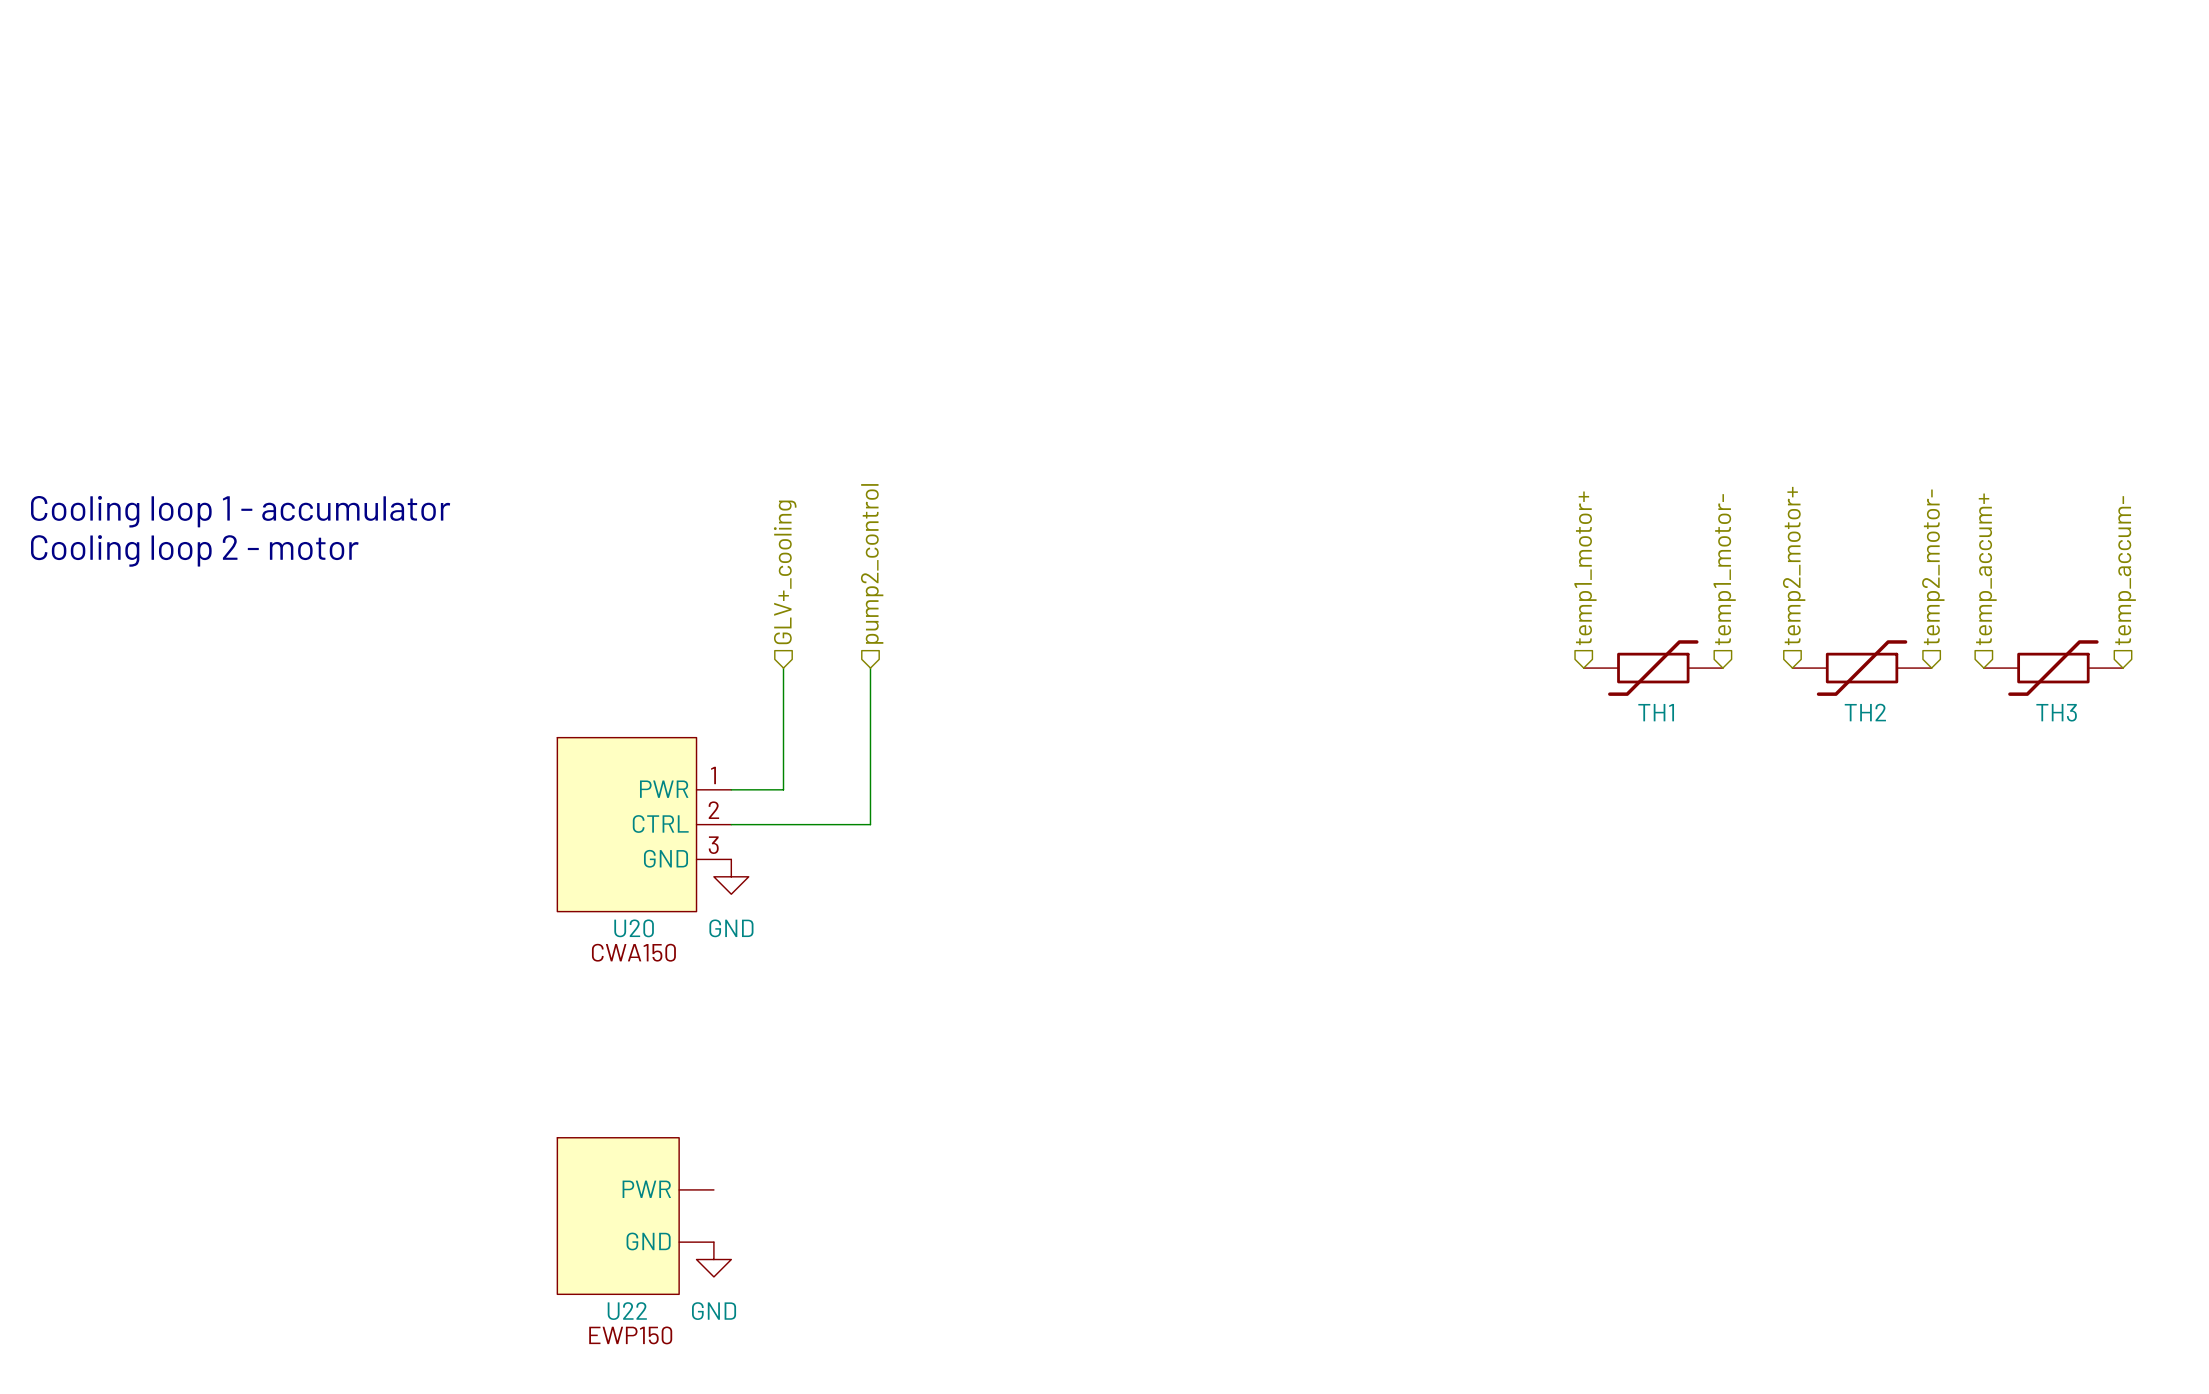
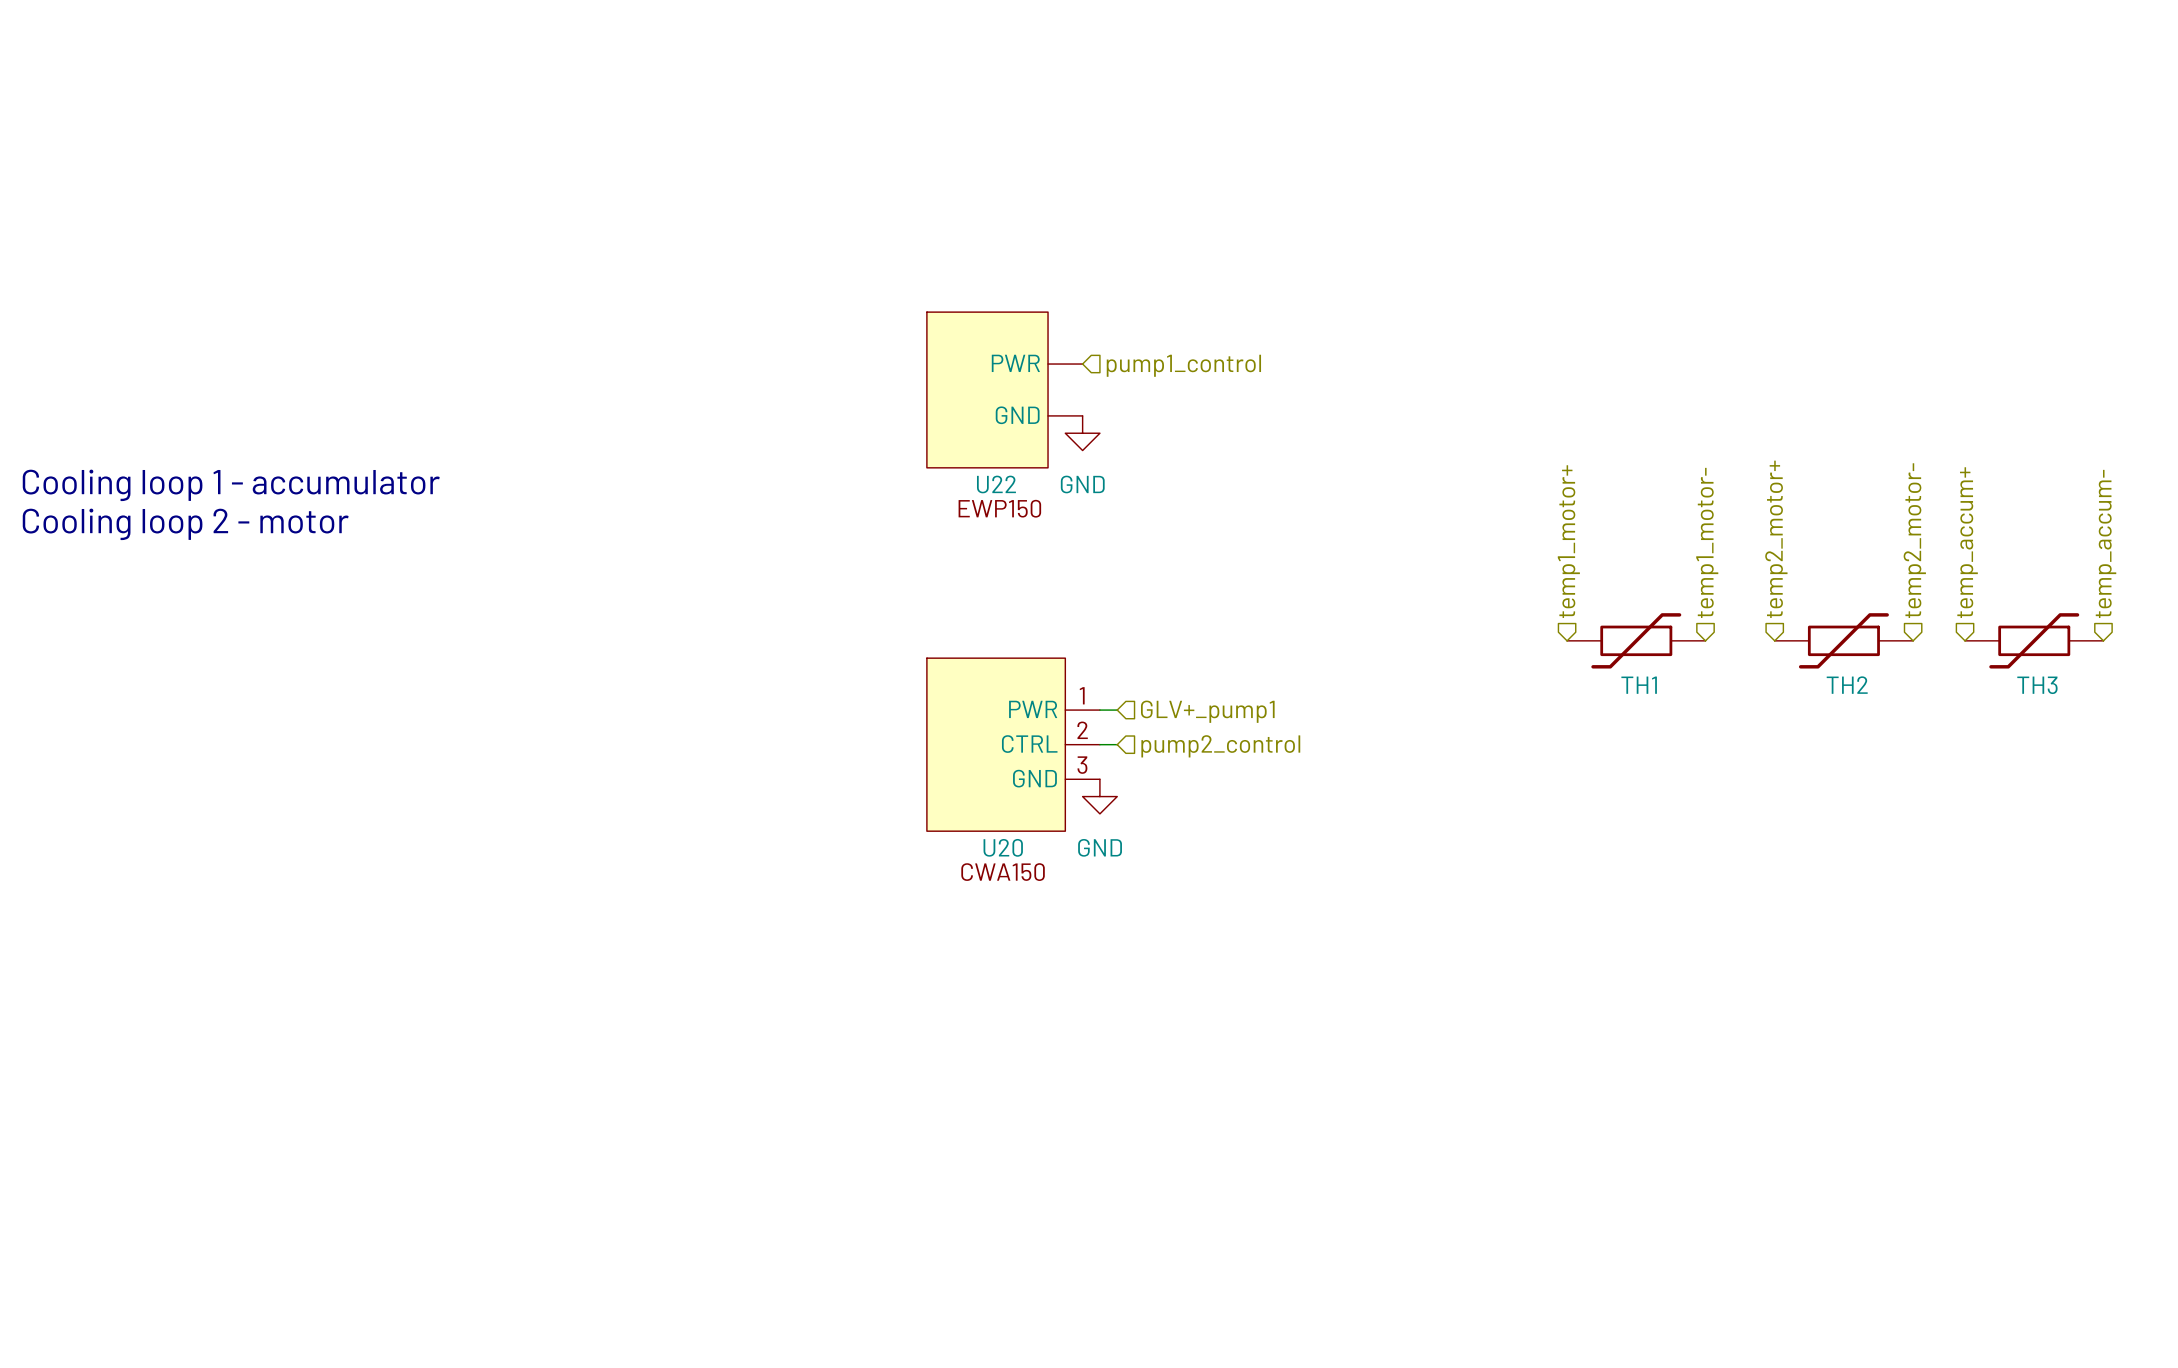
hierarchical label: none -> pump1_control (1183, 365)
power symbol: none -> GND (1082, 433)
hierarchical label rotation: 0° (872, 563) -> 90° clockwise (1220, 746)
hierarchical label position: pump2_control (872, 563) -> pump2_control (1220, 746)
hierarchical label: GLV+_cooling (785, 572) -> none
wire: (783, 668) (783, 789) (731, 789) -> none
wire: (870, 668) (870, 824) (731, 824) -> none
wire: none -> (1099, 710) (1117, 710)
hierarchical label: none -> GLV+_pump1 (1207, 711)
wire: none -> (1099, 744) (1117, 744)
U20 position: (644, 824) -> (1013, 744)
power symbol: none -> GND (1099, 796)
power symbol: GND (731, 876) -> none
U22 position: (635, 1216) -> (1004, 389)
power symbol: GND (713, 1259) -> none

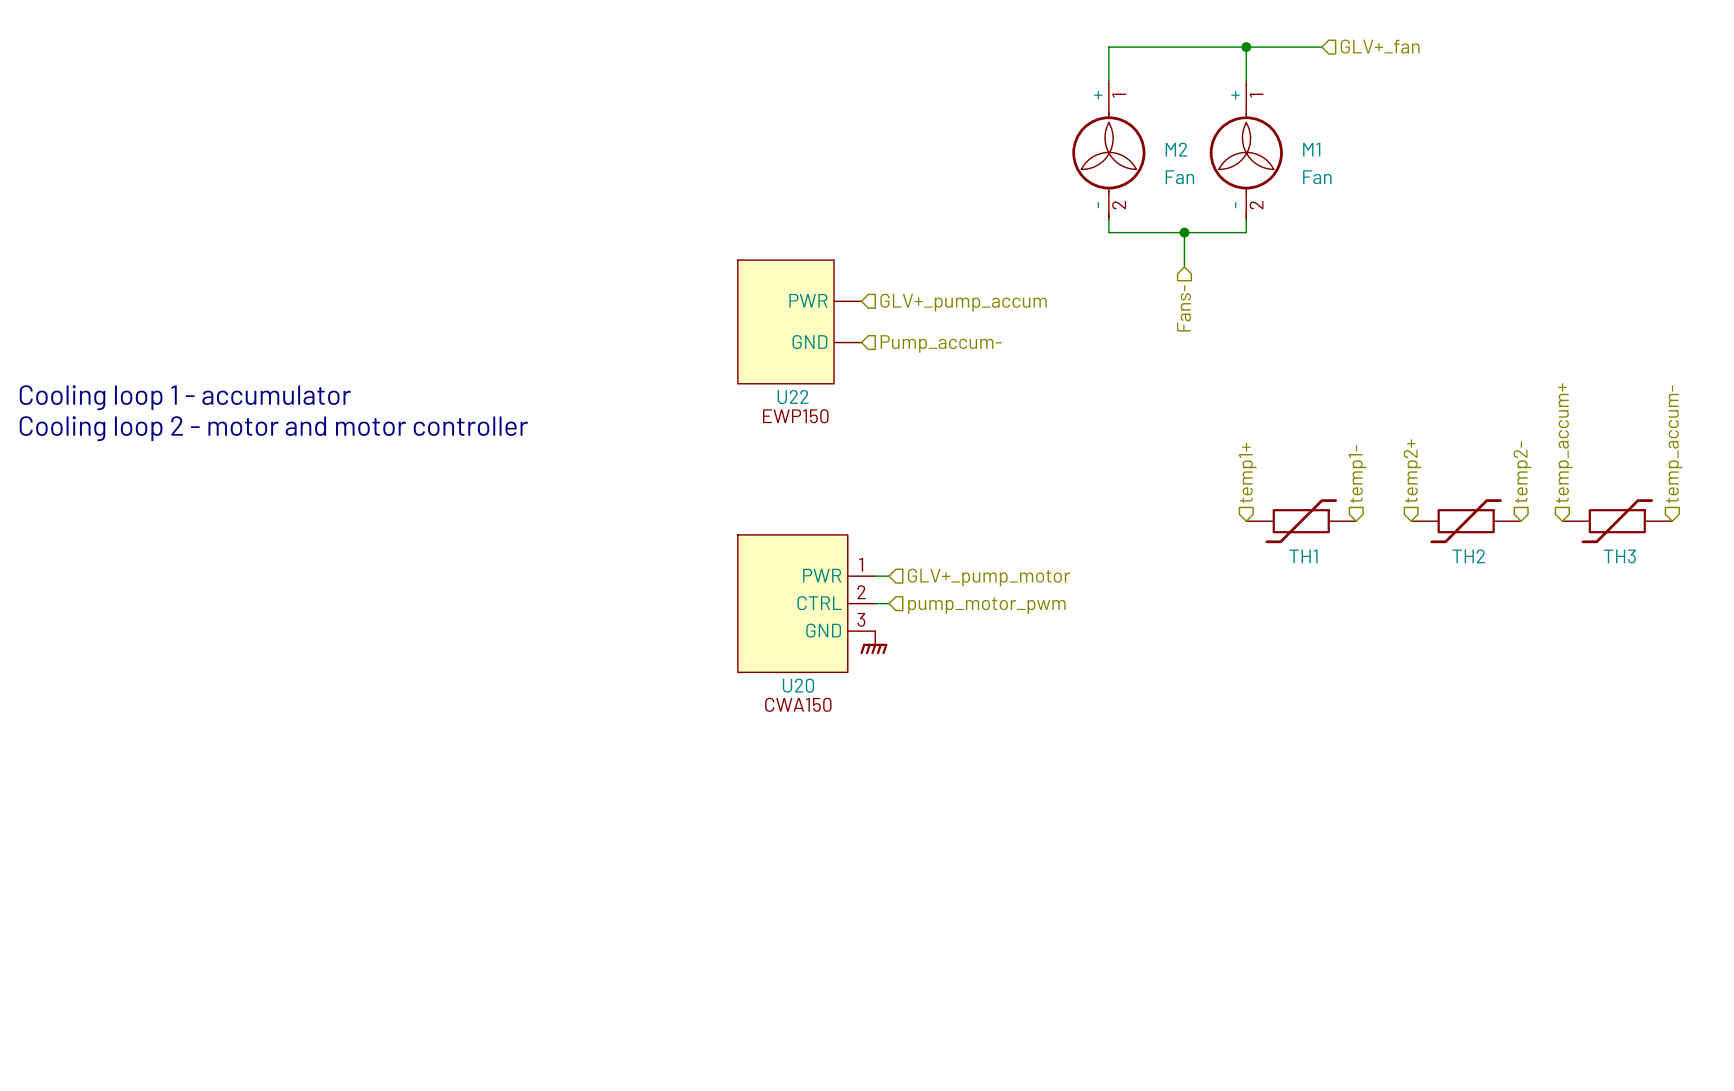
wire: none -> (1246, 47) (1246, 81)
junction: none -> (1246, 47)
wire: none -> (1321, 47) (1108, 47) (1108, 81)
hierarchical label: none -> GLV+_fan (1380, 46)
M2: none -> Fan (1108, 150)
M1: none -> Fan (1246, 150)
wire: none -> (1108, 218) (1108, 232) (1246, 232) (1246, 218)
wire: none -> (1184, 232) (1184, 266)
junction: none -> (1184, 232)
hierarchical label: pump1_control (1183, 365) -> GLV+_pump_accum (963, 302)
hierarchical label: none -> Fans- (1184, 308)
hierarchical label: none -> Pump_accum- (941, 343)
power symbol: GND (1082, 433) -> none
text: Cooling loop 2 - motor (185, 524) -> Cooling loop 2 - motor and motor controller (273, 428)
hierarchical label: temp2_motor+ (1776, 539) -> temp2+ (1412, 471)
hierarchical label: temp2_motor- (1914, 540) -> temp2- (1522, 472)
hierarchical label: temp1_motor+ (1568, 541) -> temp1+ (1247, 473)
hierarchical label: temp1_motor- (1707, 542) -> temp1- (1357, 474)
hierarchical label: GLV+_pump1 (1207, 711) -> GLV+_pump_motor (988, 577)
hierarchical label: pump2_control (1220, 746) -> pump_motor_pwm (986, 605)
power symbol shape: [1082, 779, 1118, 814] -> [860, 631, 888, 655]
power symbol text: GND (1100, 847) -> none

